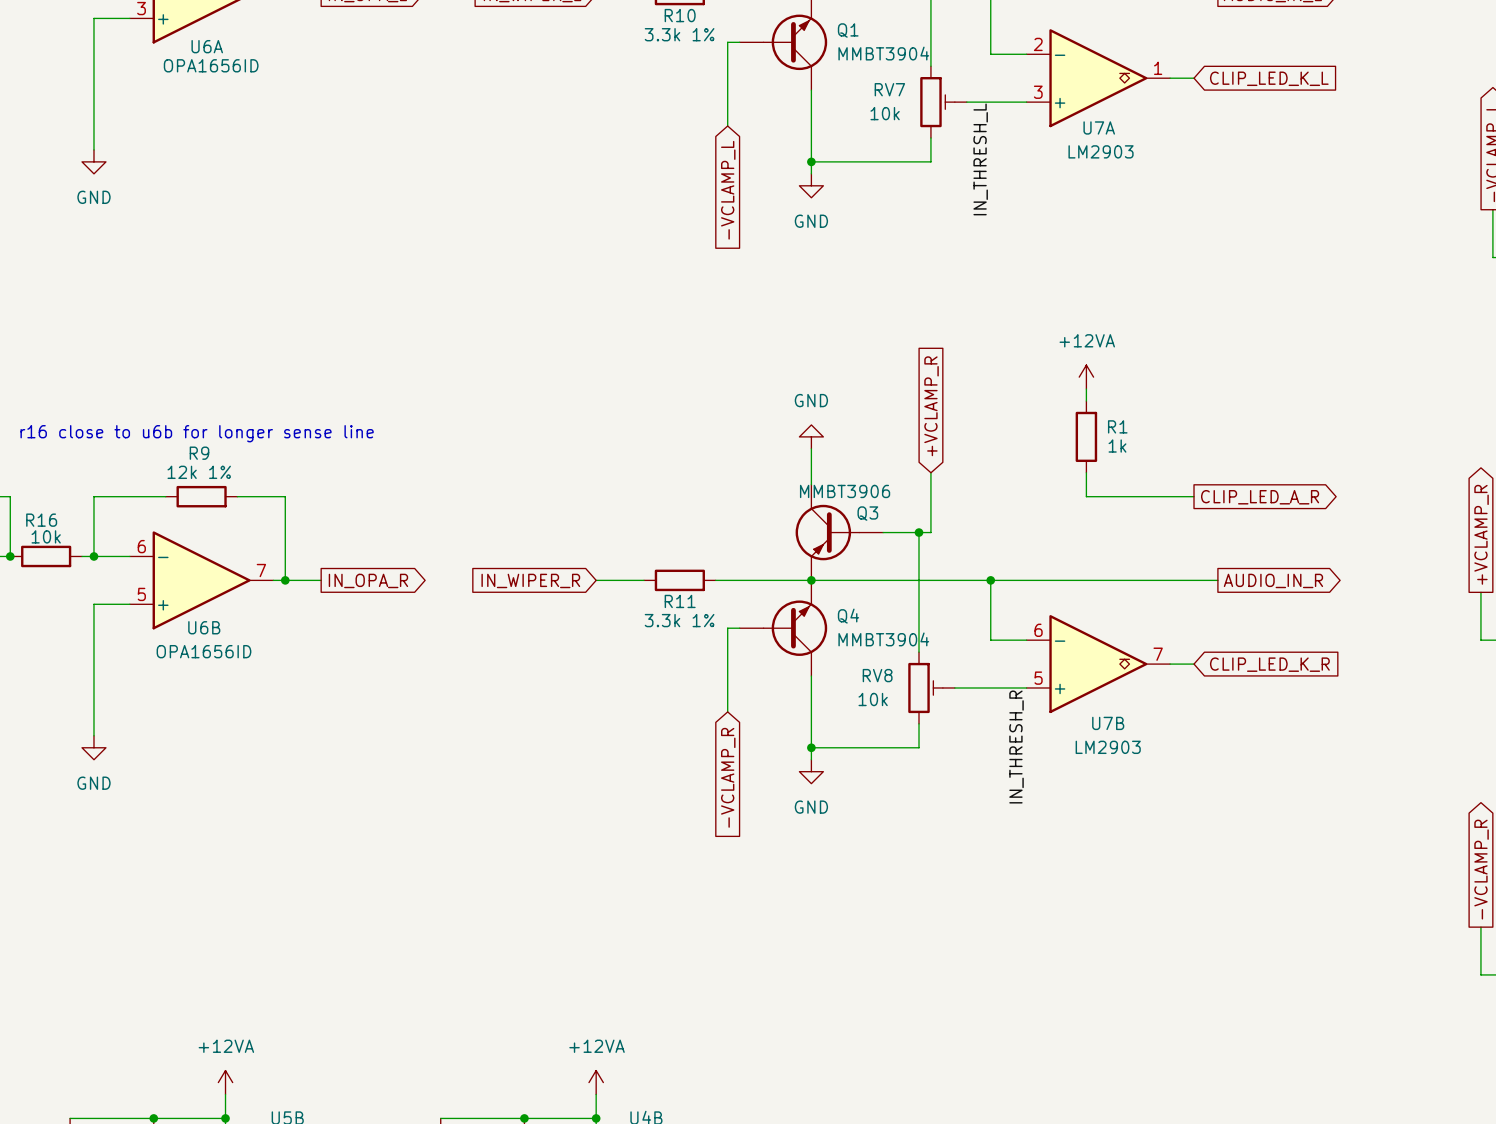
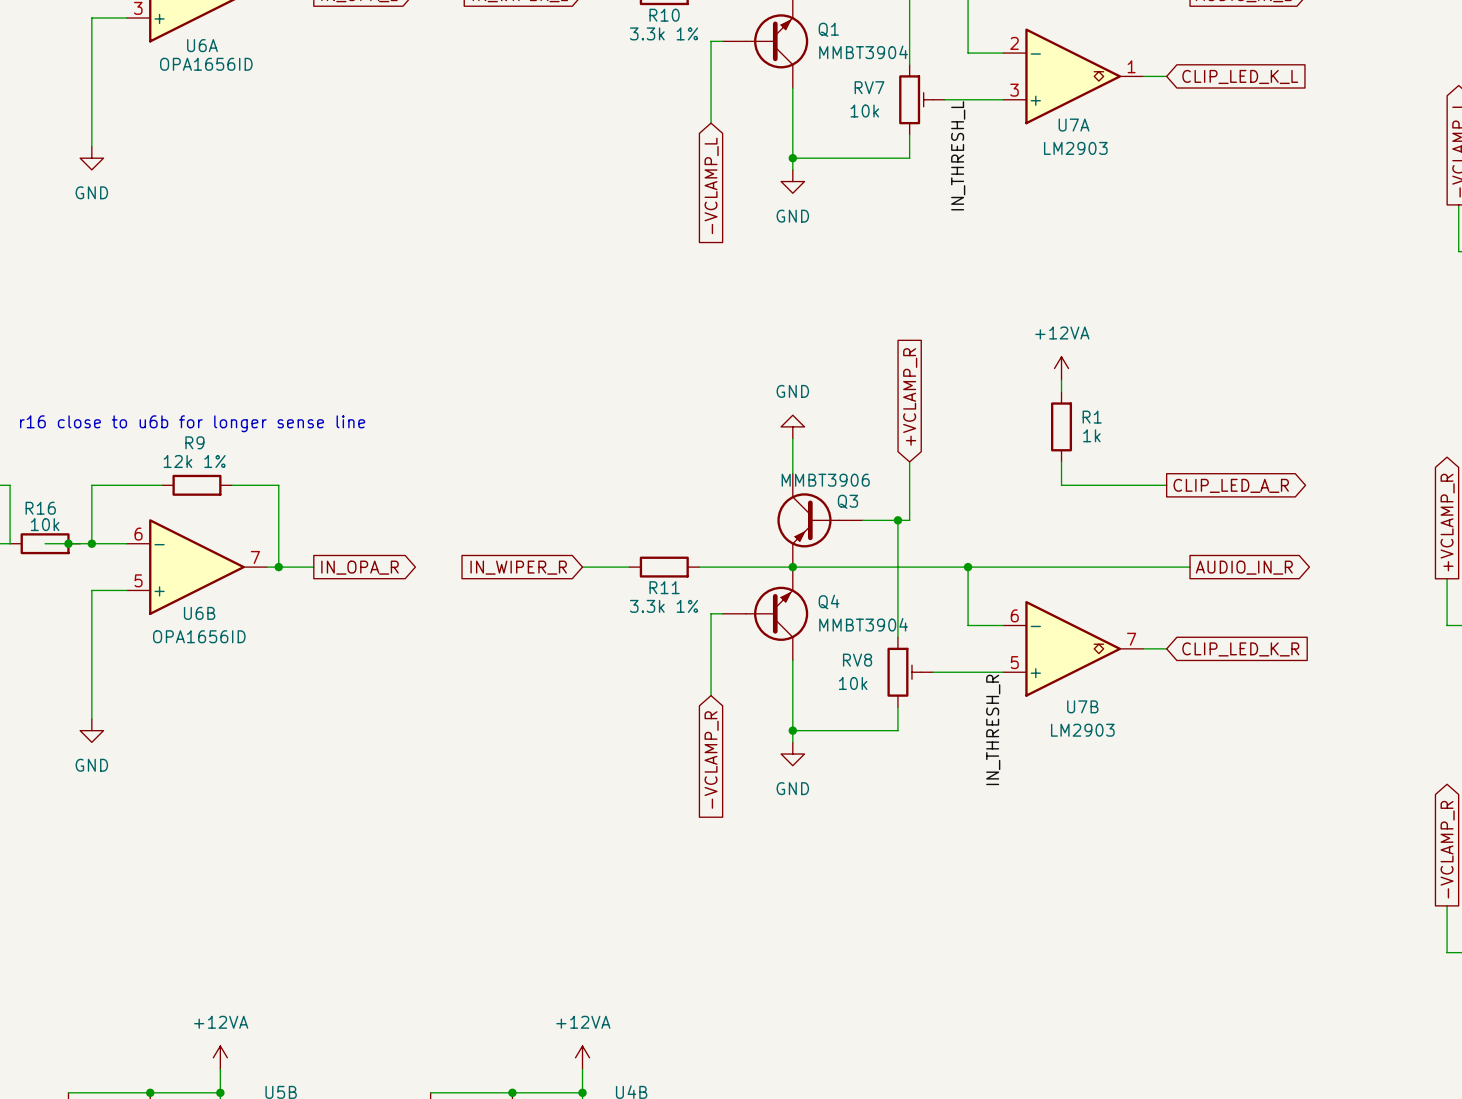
junction: (10, 556) -> none
wire: none -> (45, 543) (80, 543)
junction: none -> (68, 543)

